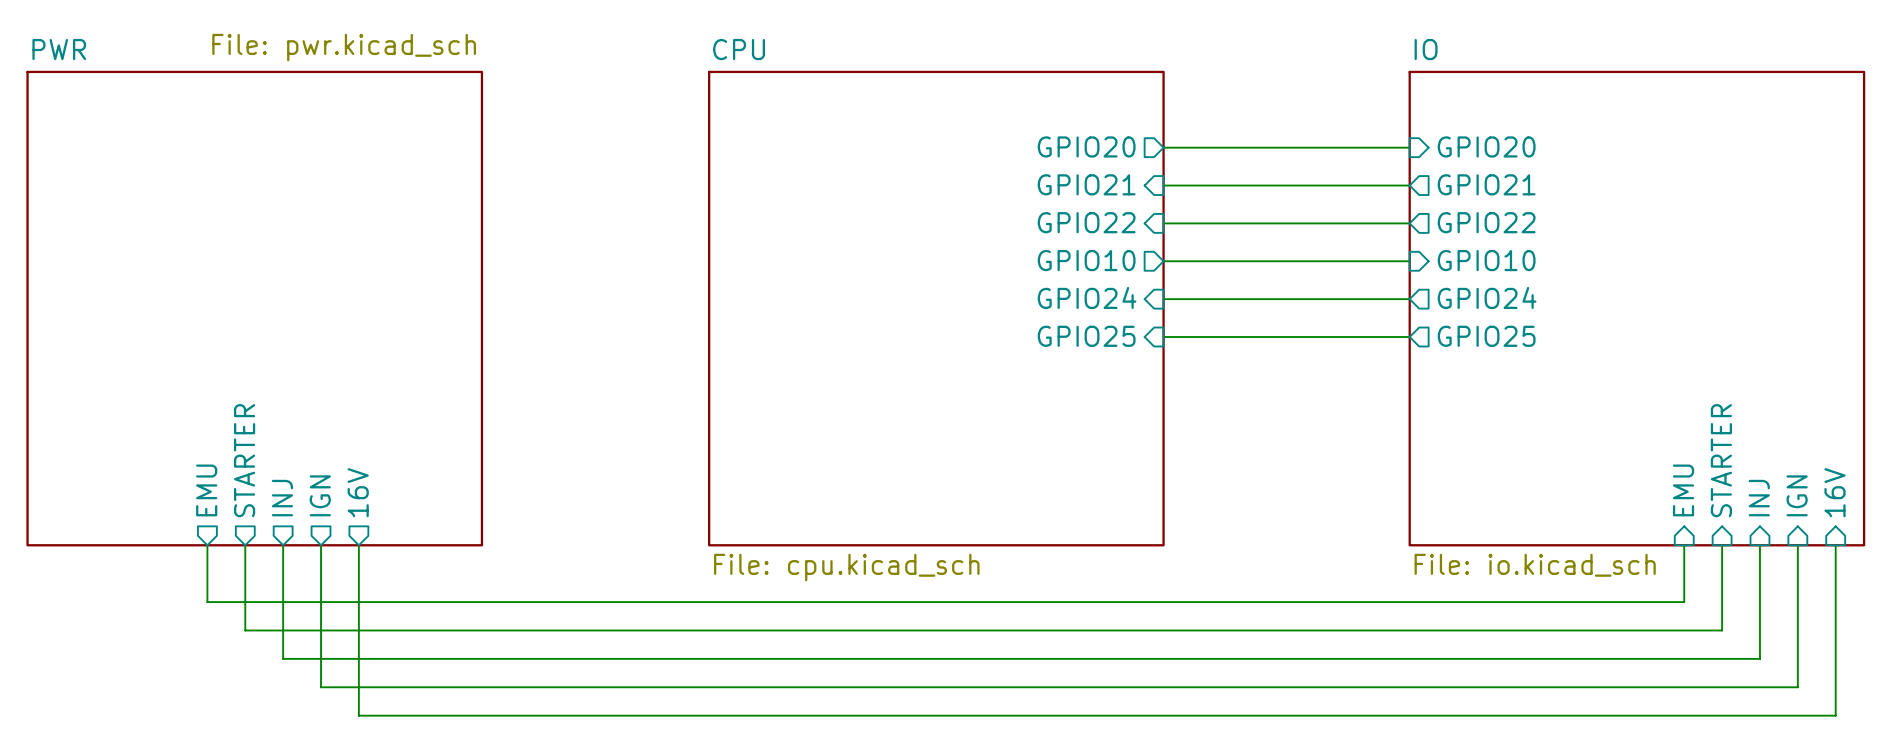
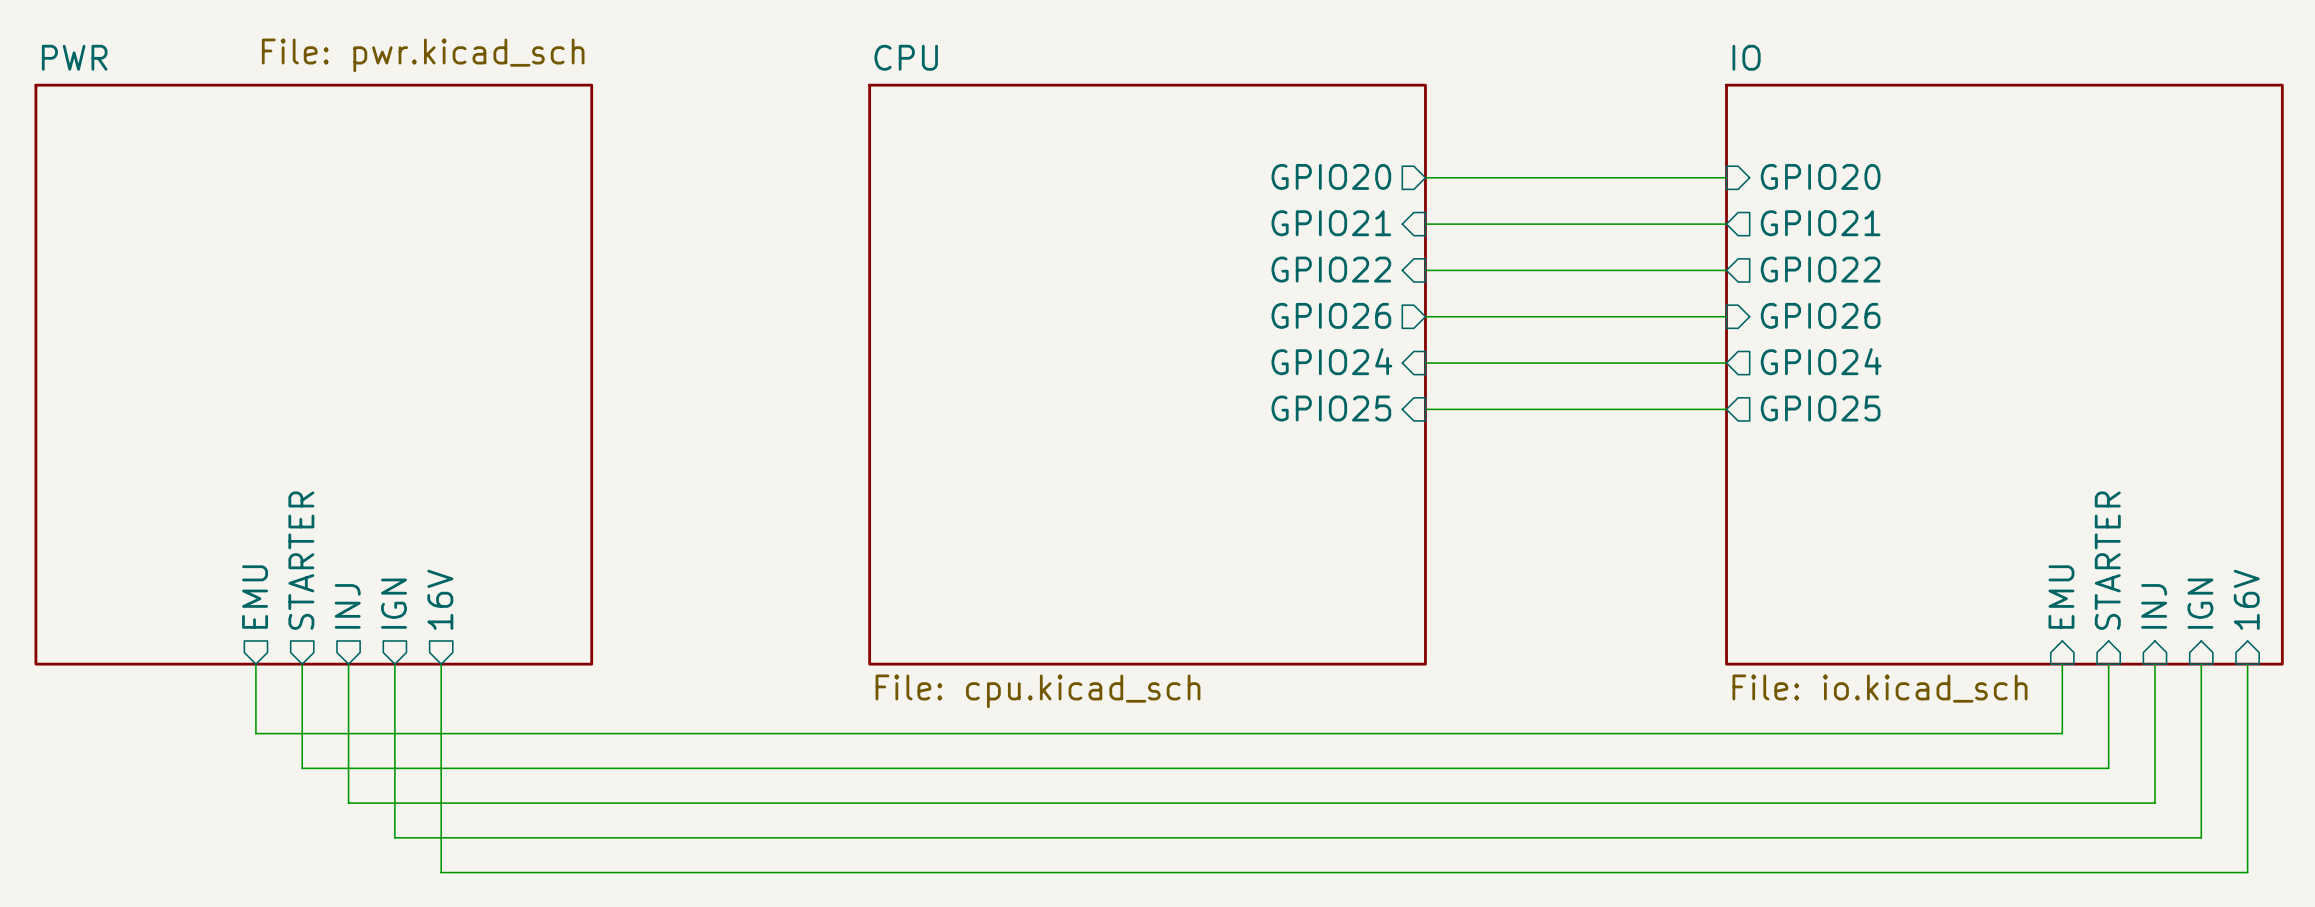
sheet pin: GPIO10 (1086, 260) -> GPIO26 (1331, 315)
sheet pin: GPIO10 (1486, 260) -> GPIO26 (1820, 315)

